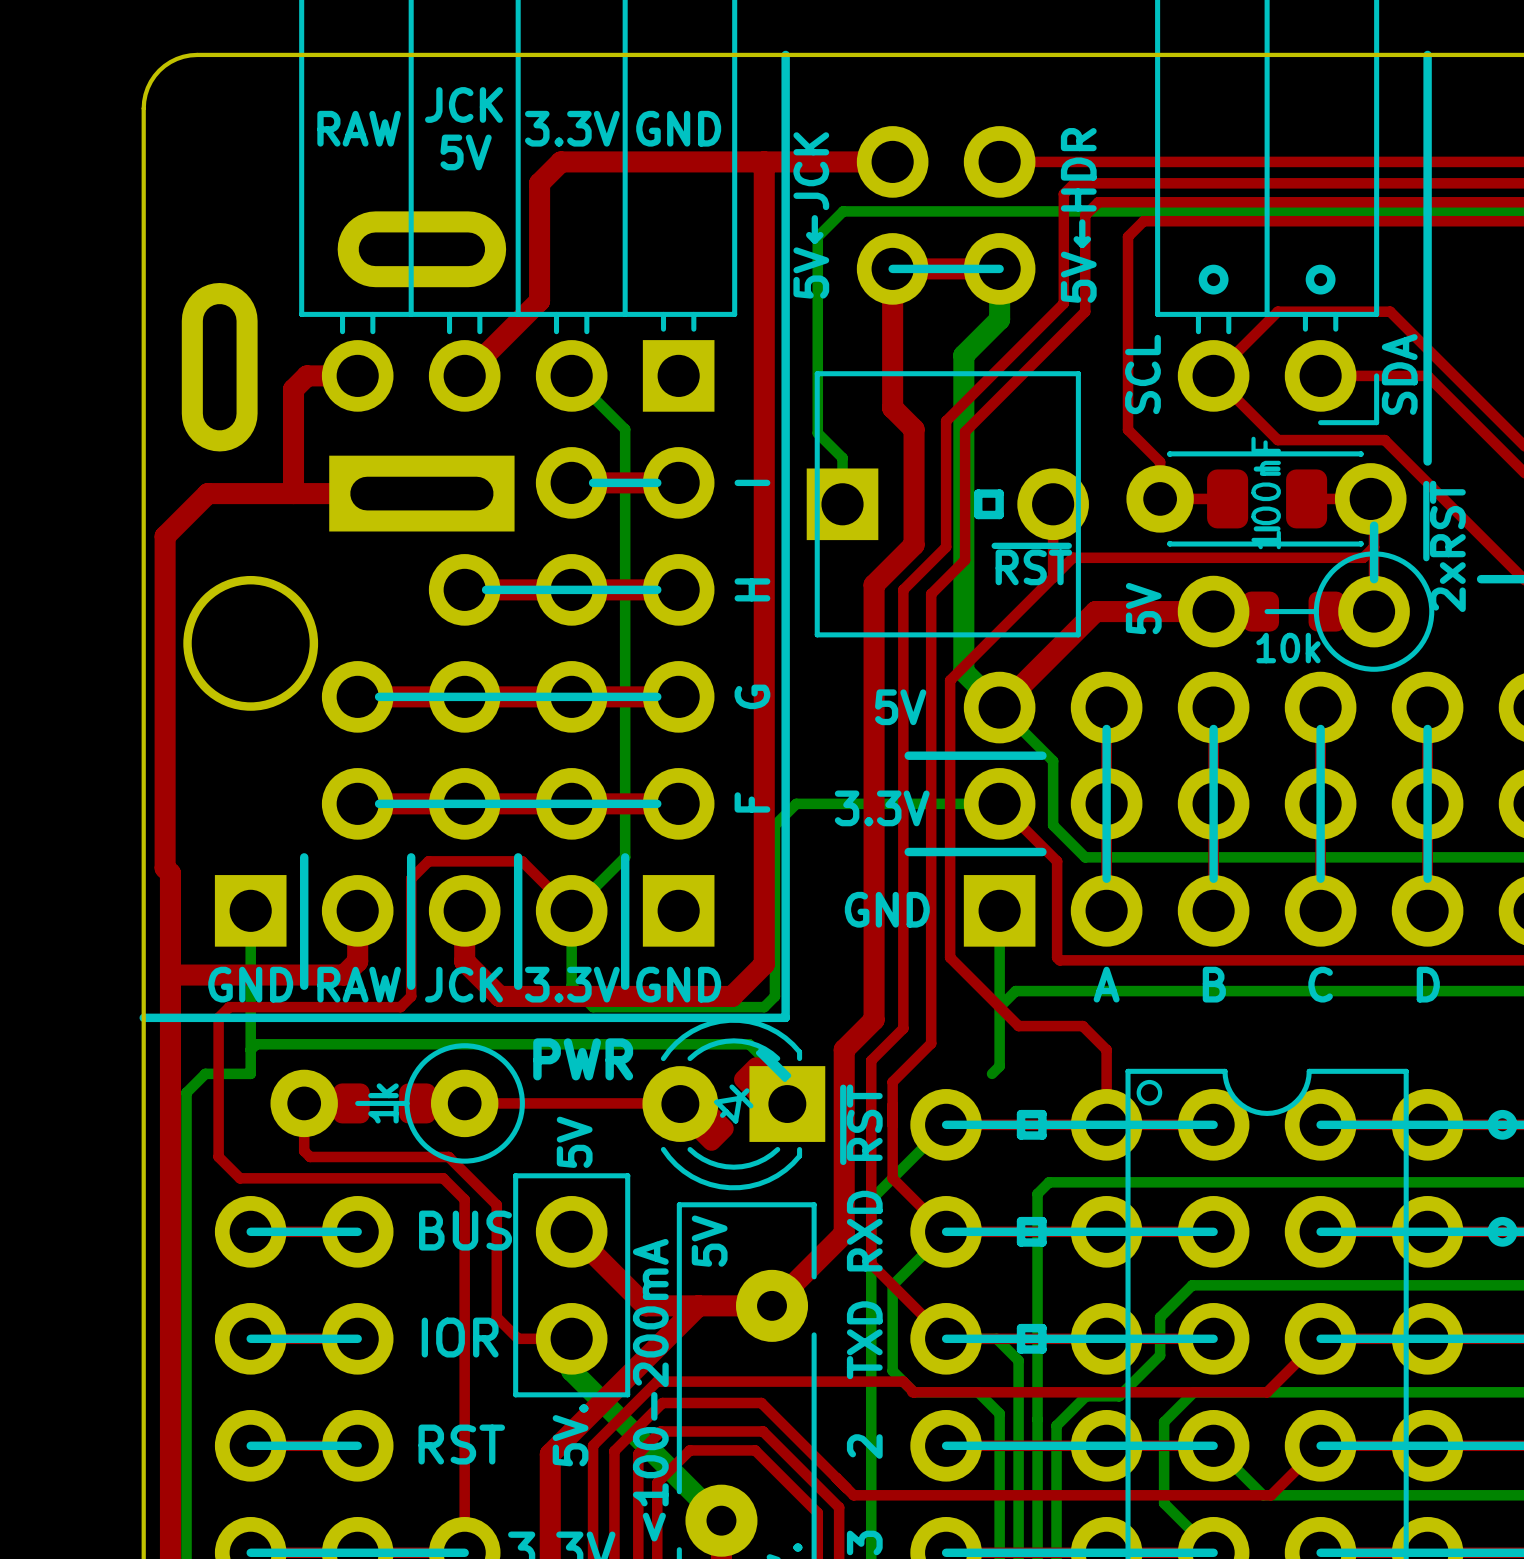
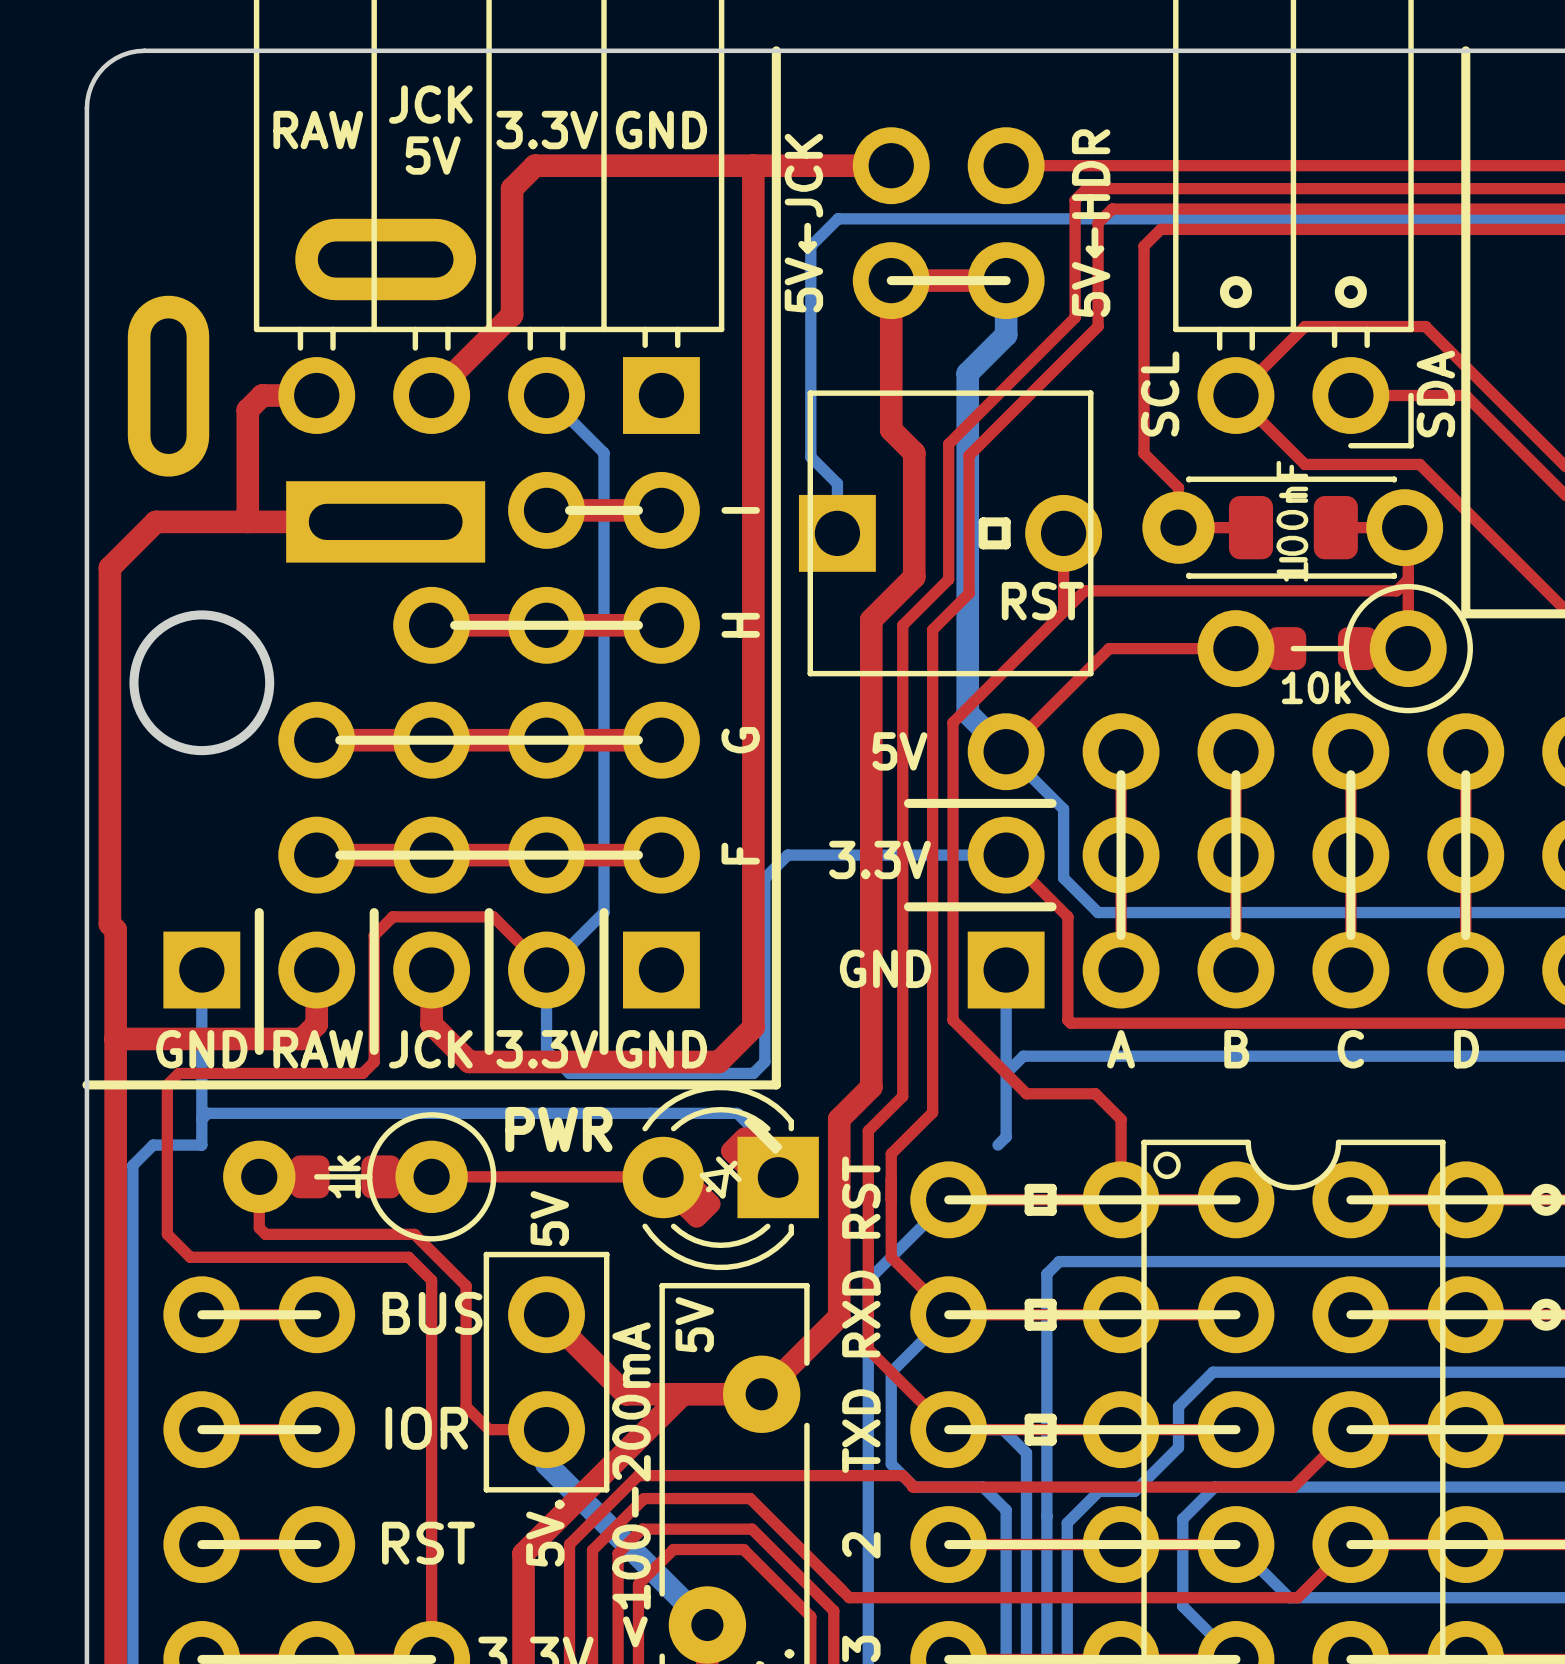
line: none -> (1465, 487) (1465, 613) (1523, 613)
line: (1374, 525) (1374, 579) -> none
text: 2x~{RST} (1444, 546) -> none
text: ~{RST} (1031, 563) -> RST (1042, 601)
text: 5V (1143, 608) -> none
top track width: thick (1213, 611) (1095, 611) (999, 707) -> thin (1235, 648) (1109, 648) (1006, 751)
text: ~{RST} (861, 1124) -> RST (861, 1197)

